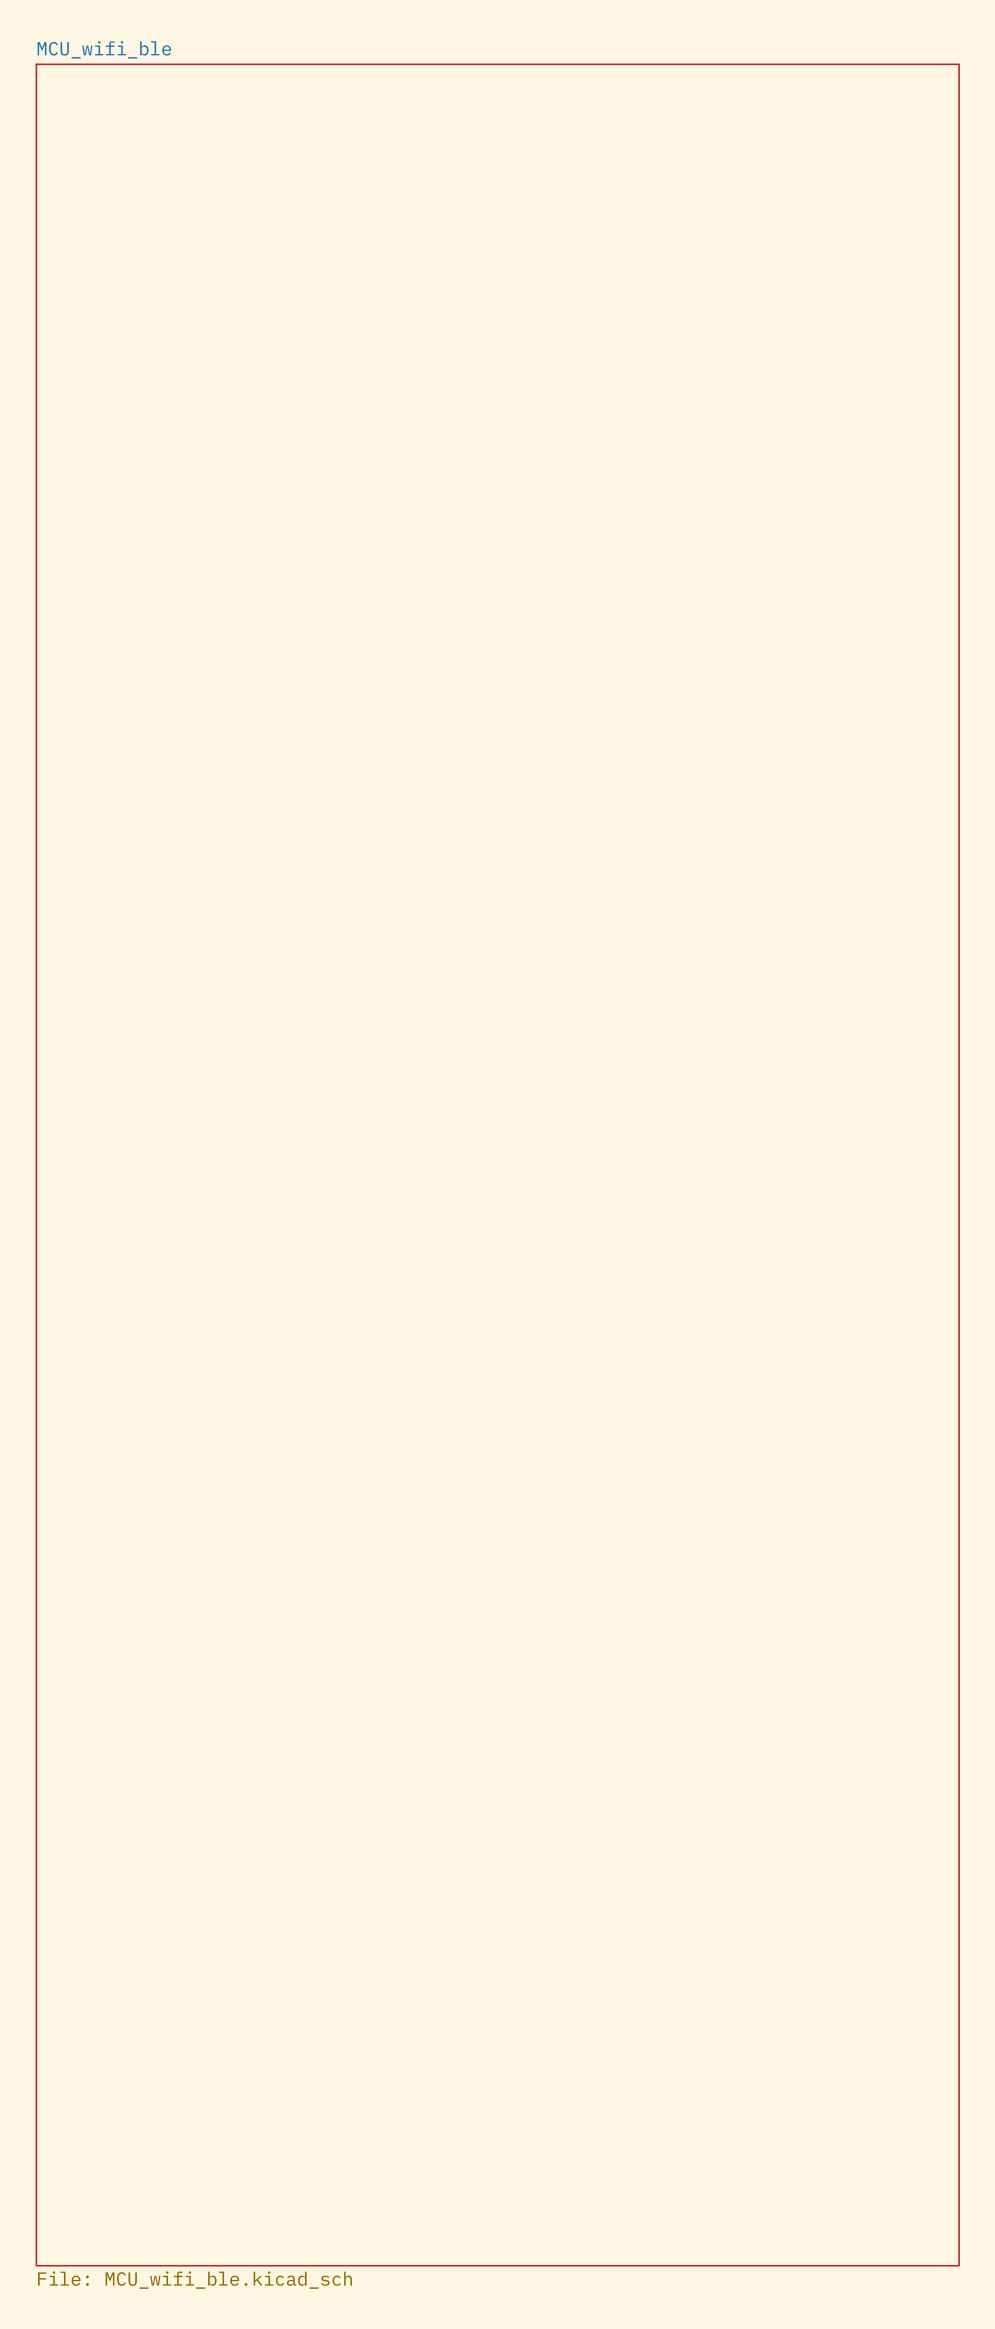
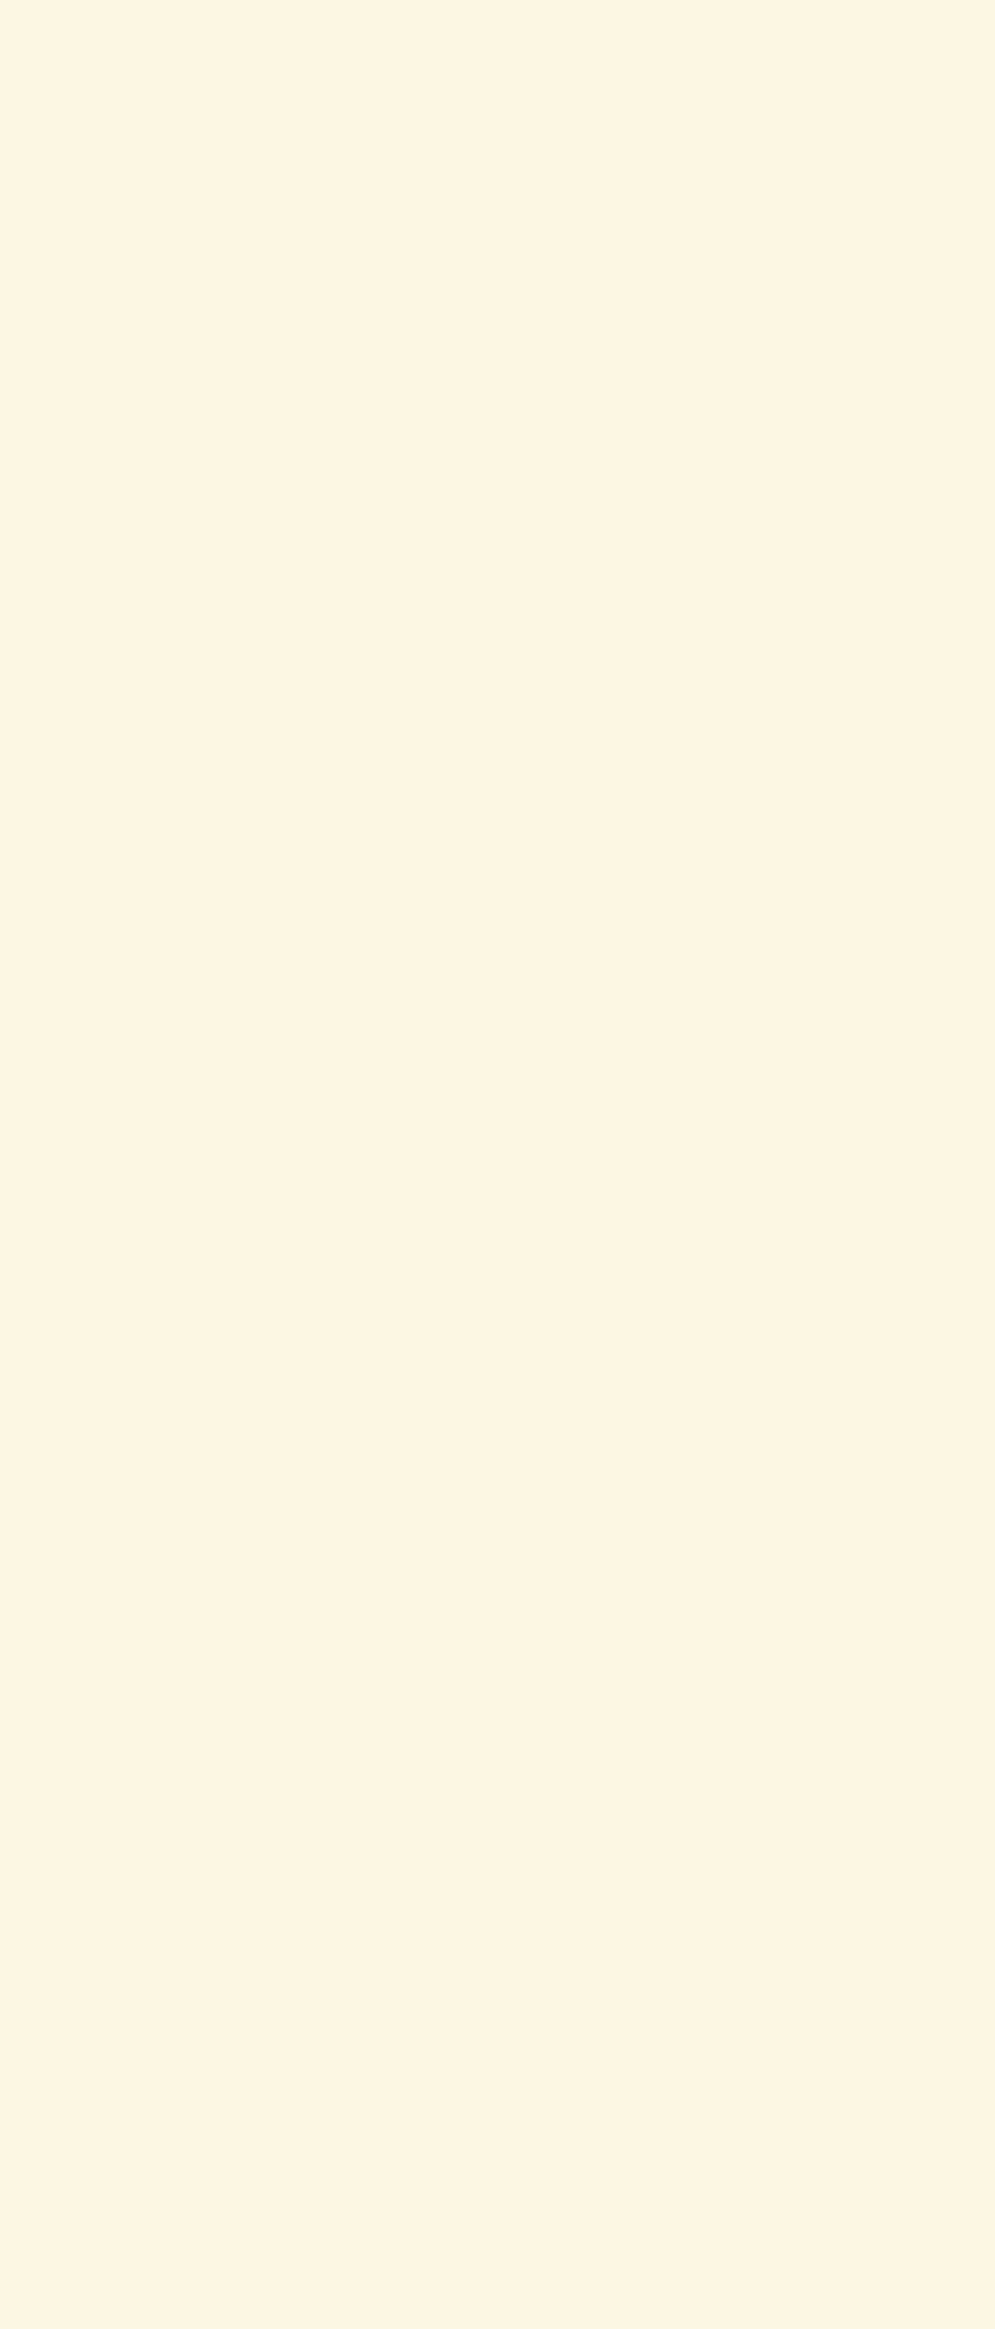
sheet MCU_wifi_ble: File: MCU_wifi_ble.kicad_sch (497, 1165) -> none

